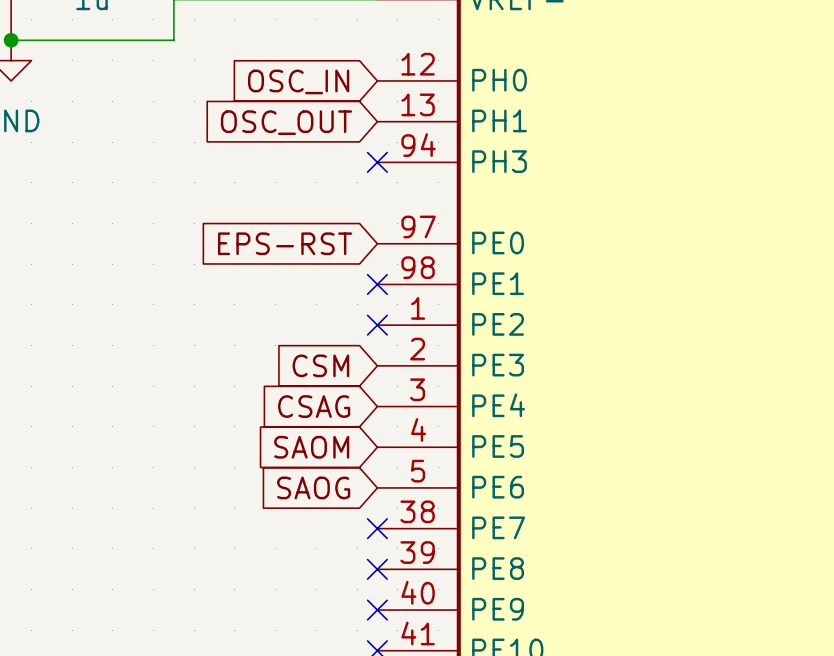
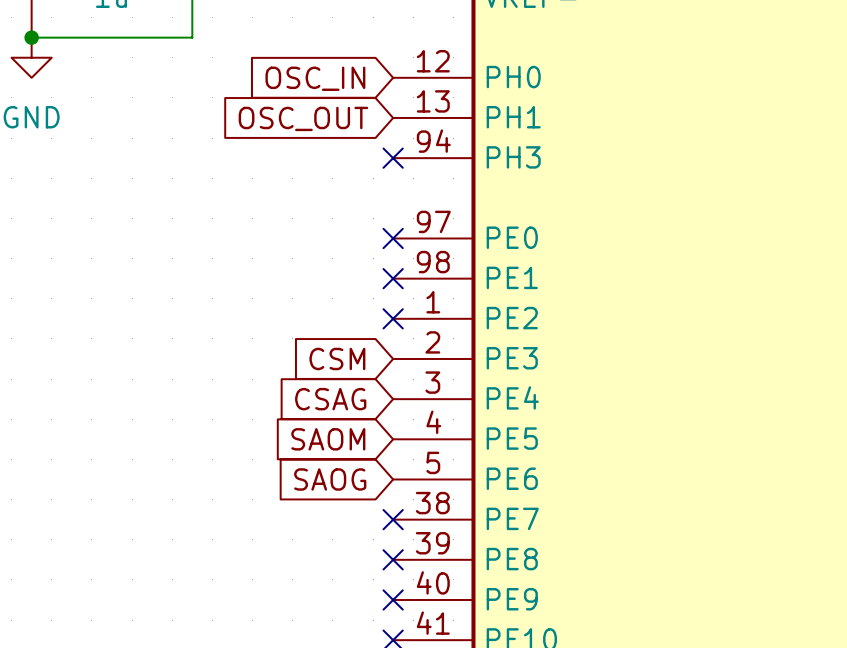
global label: EPS-RST (285, 243) -> none
no-connect mark: none -> (393, 238)

